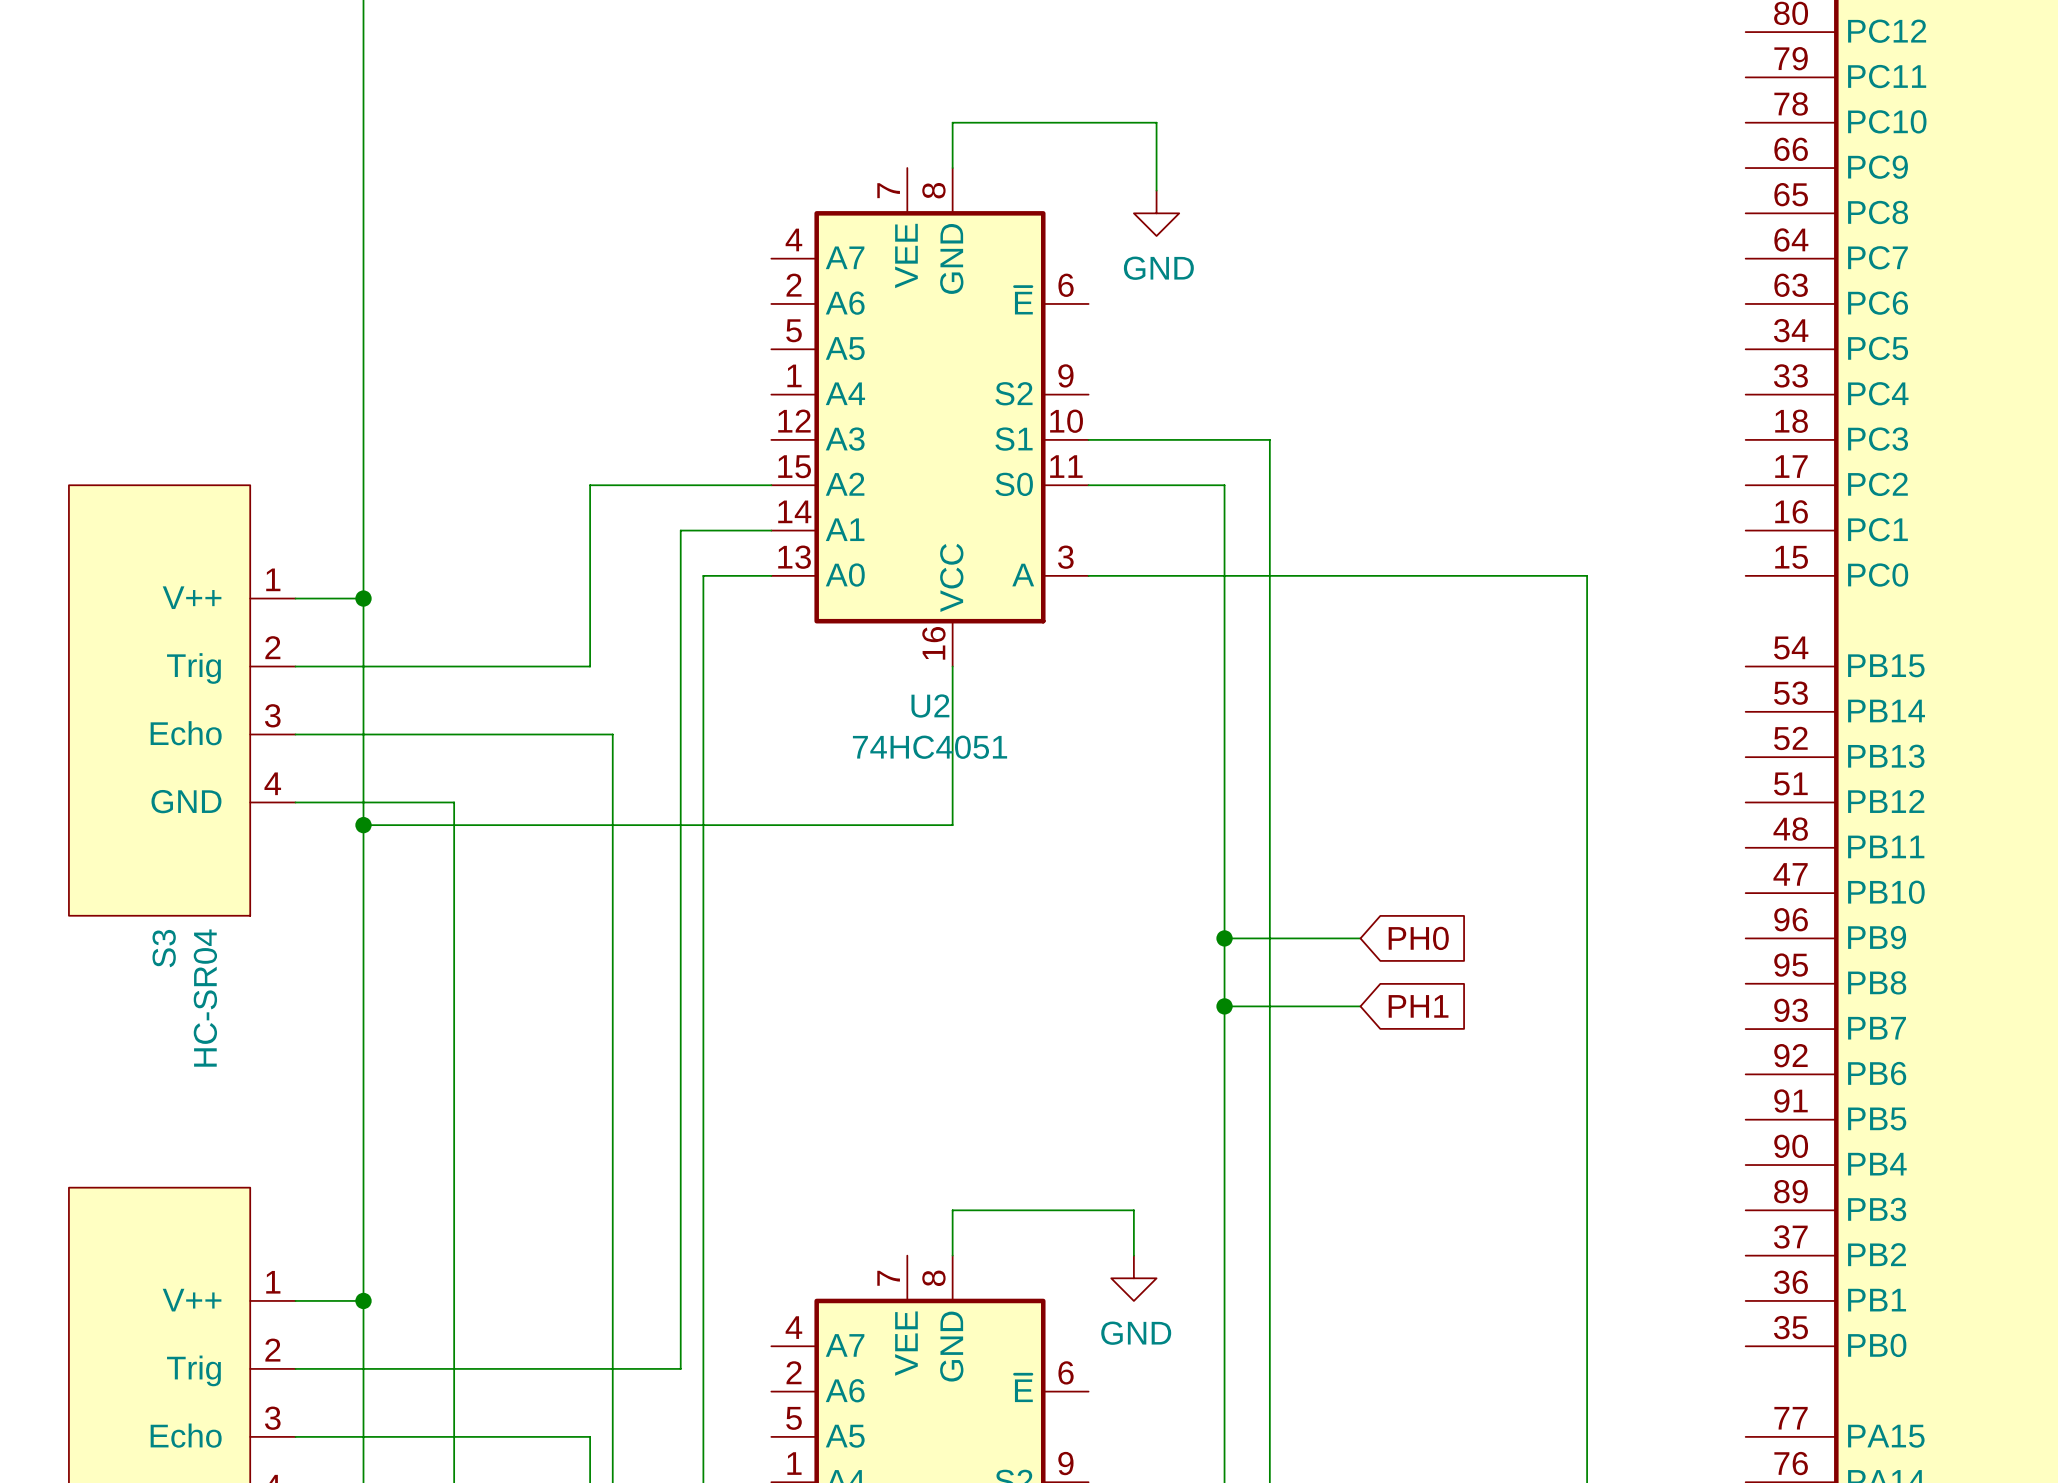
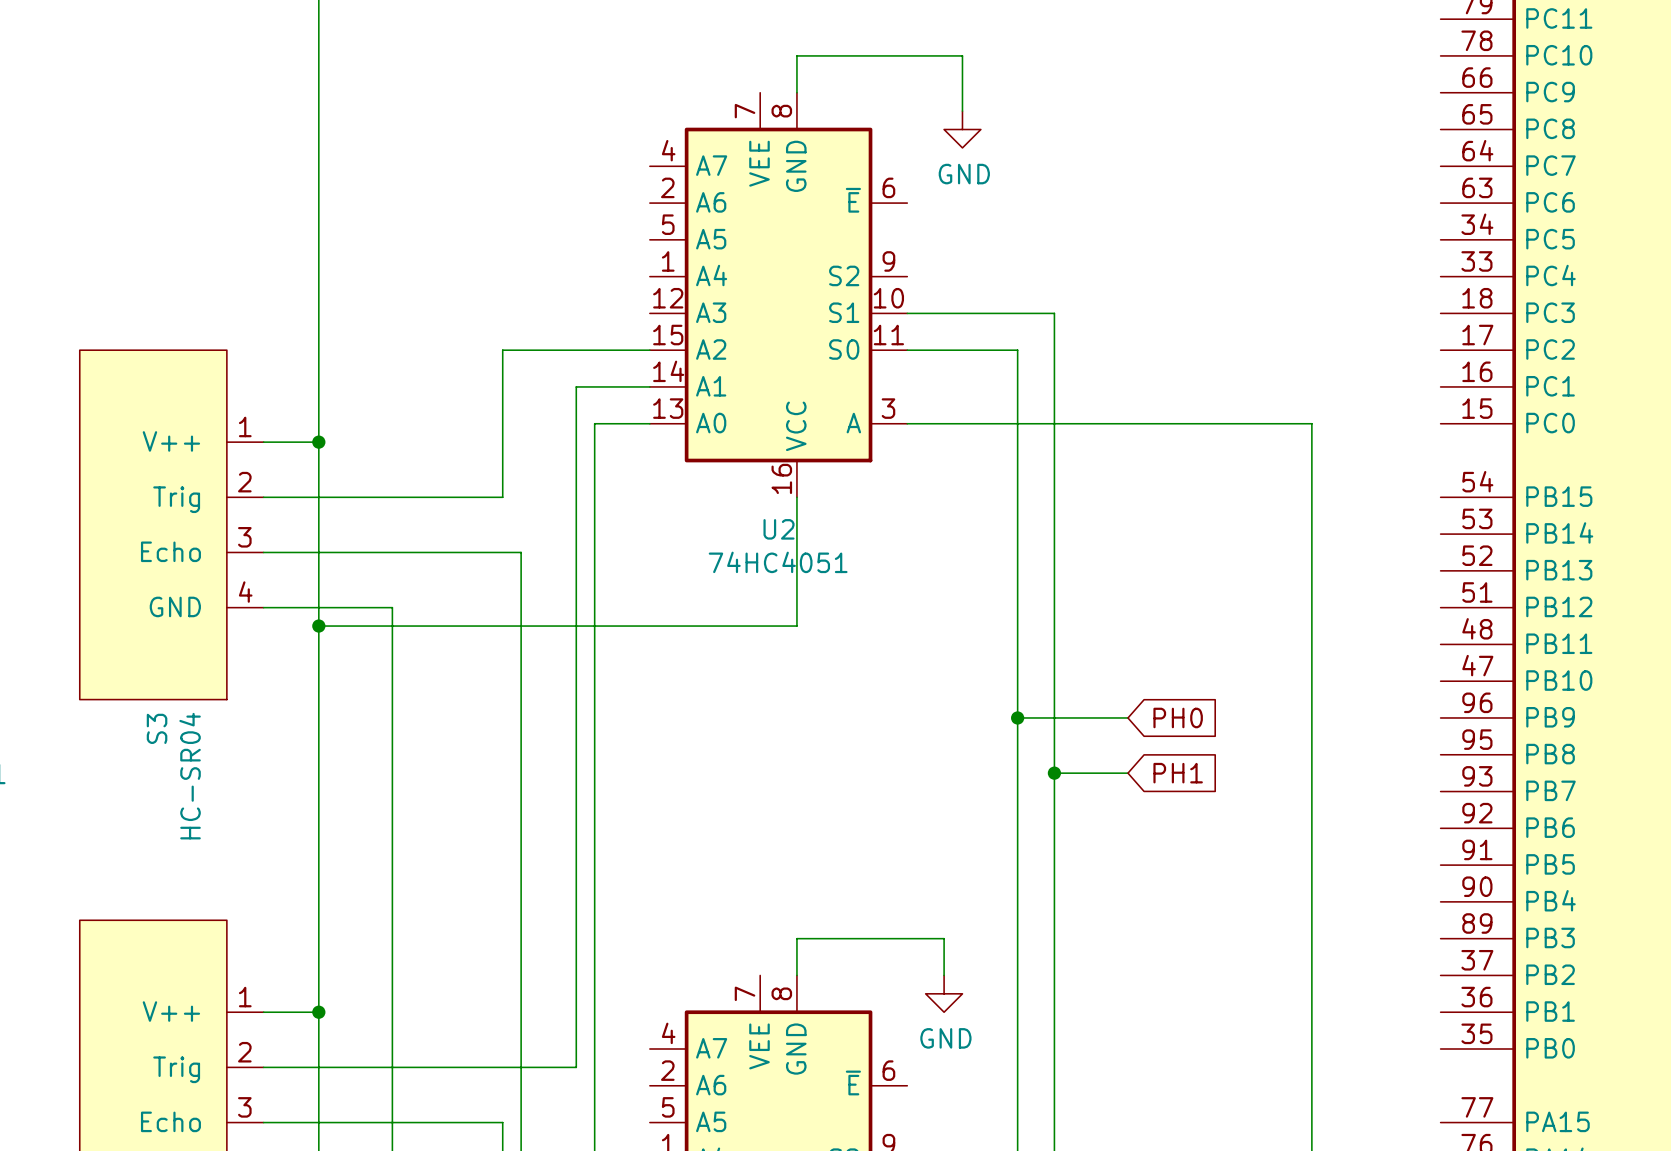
wire: (1224, 1006) (1269, 1006) -> none
junction position: (1224, 1006) -> (1054, 773)

